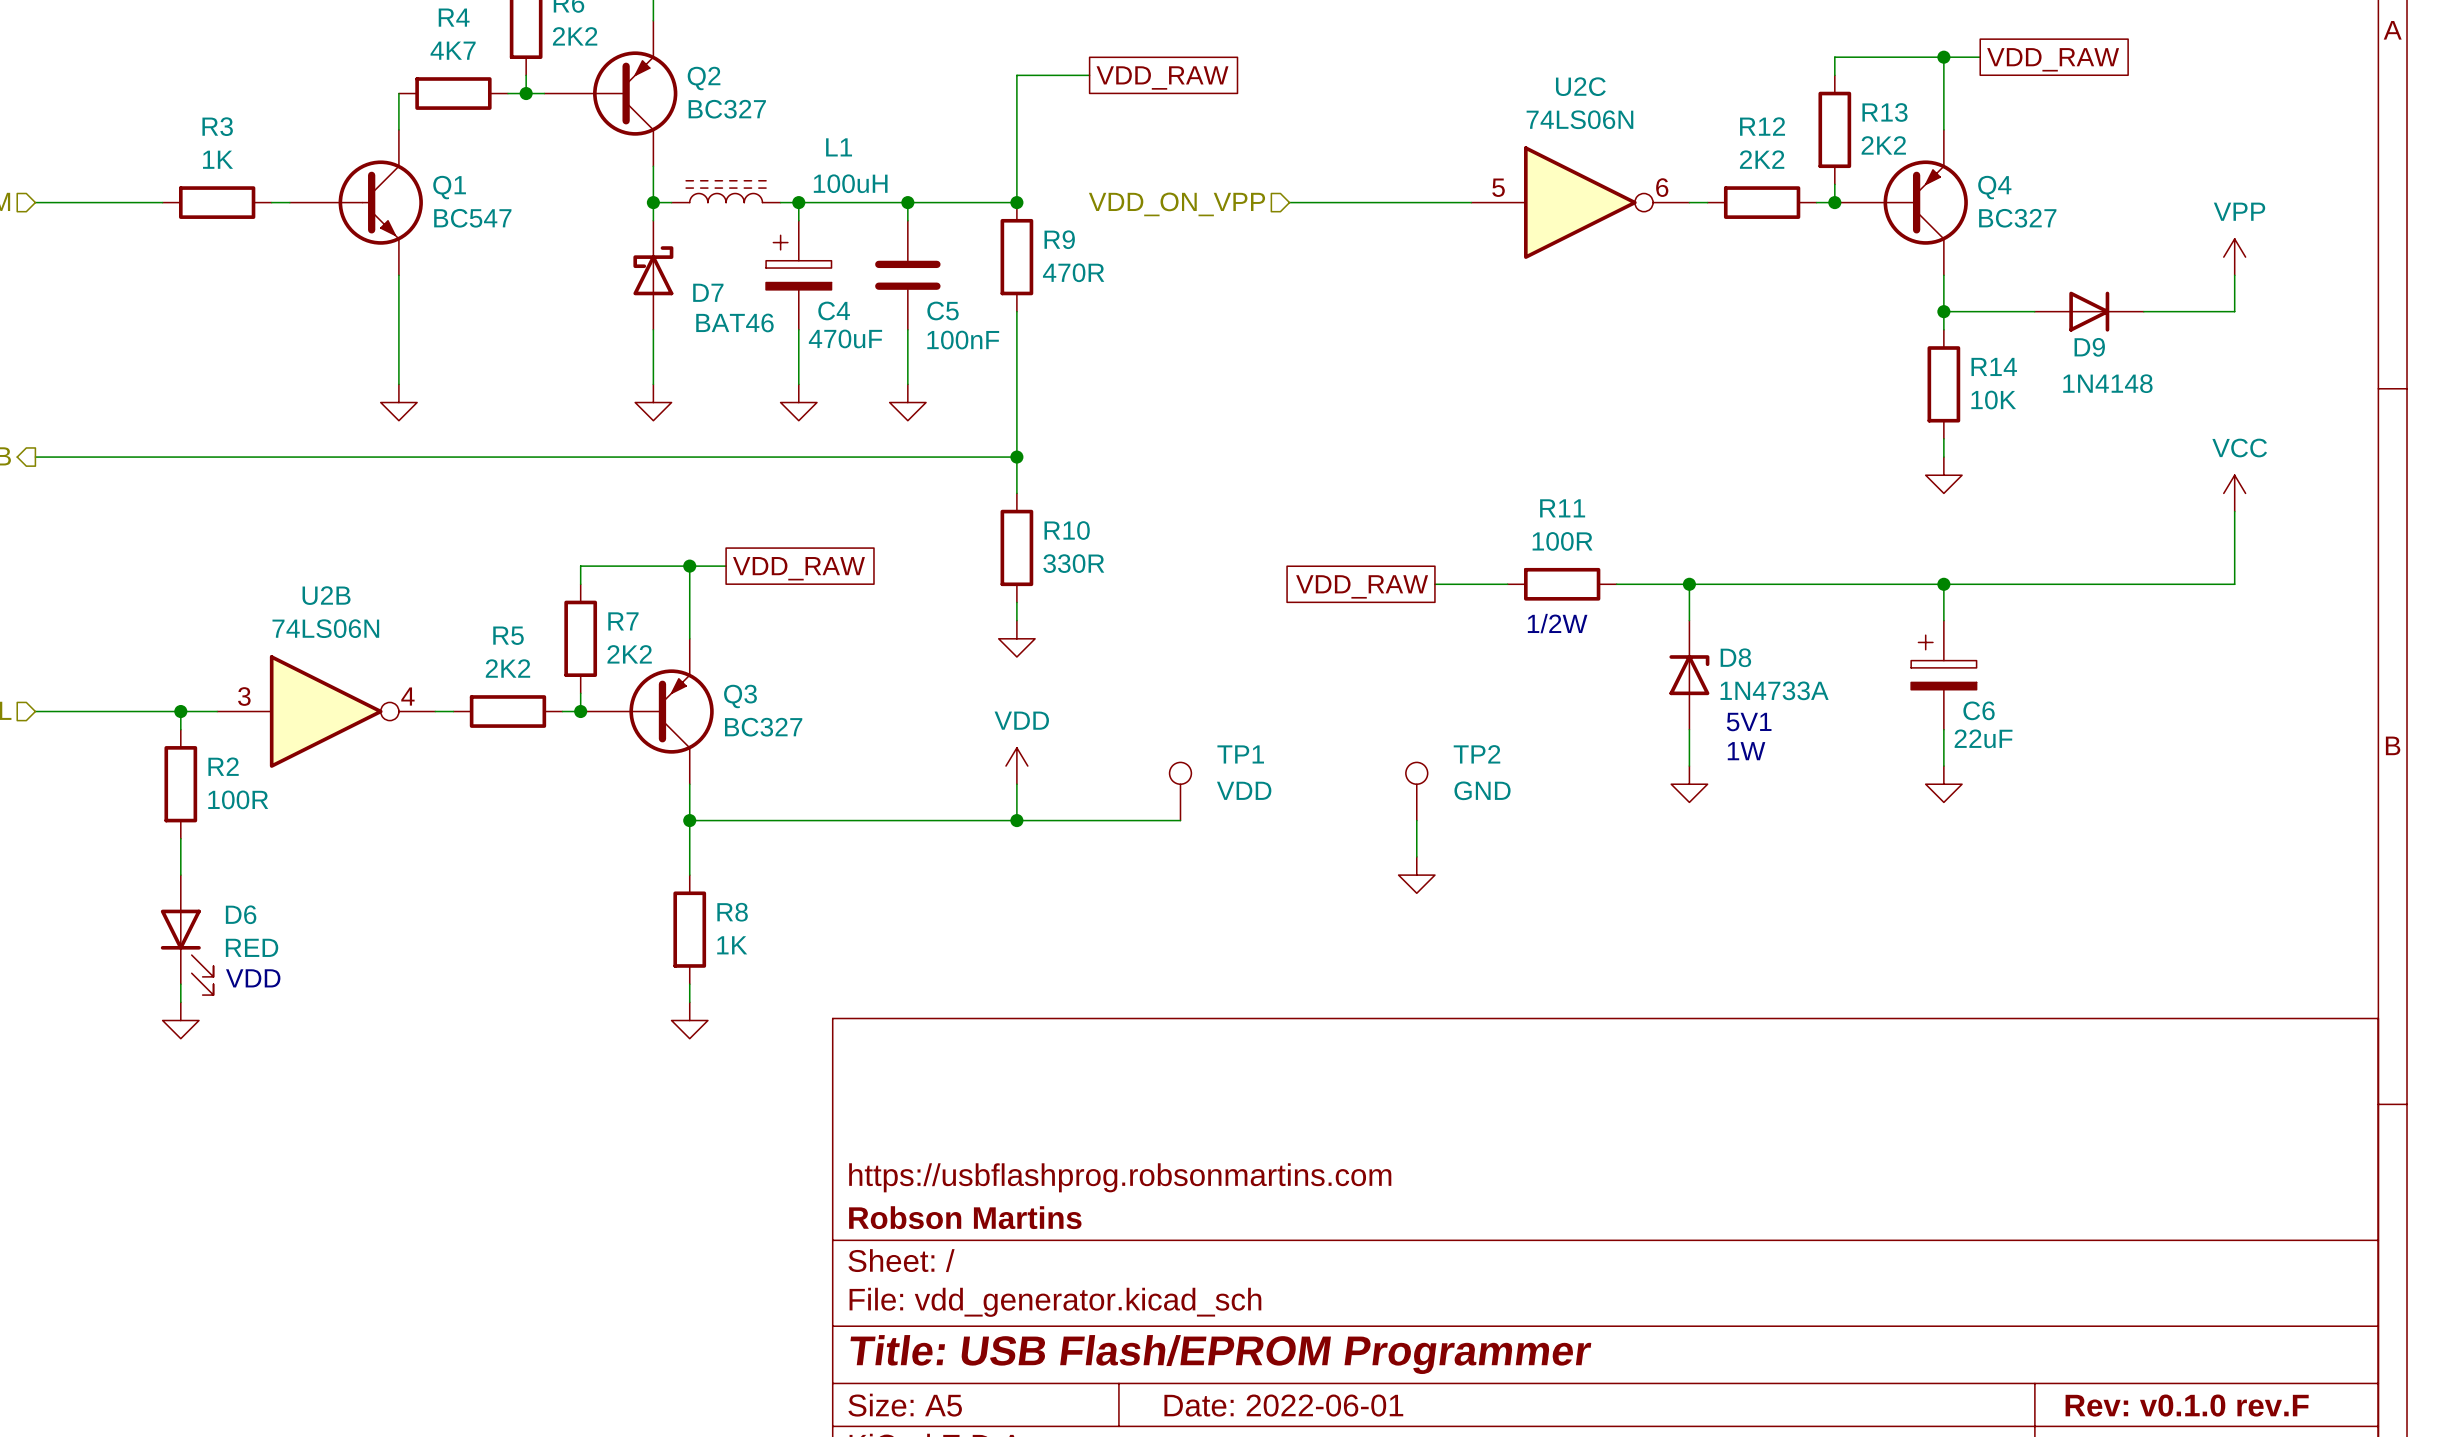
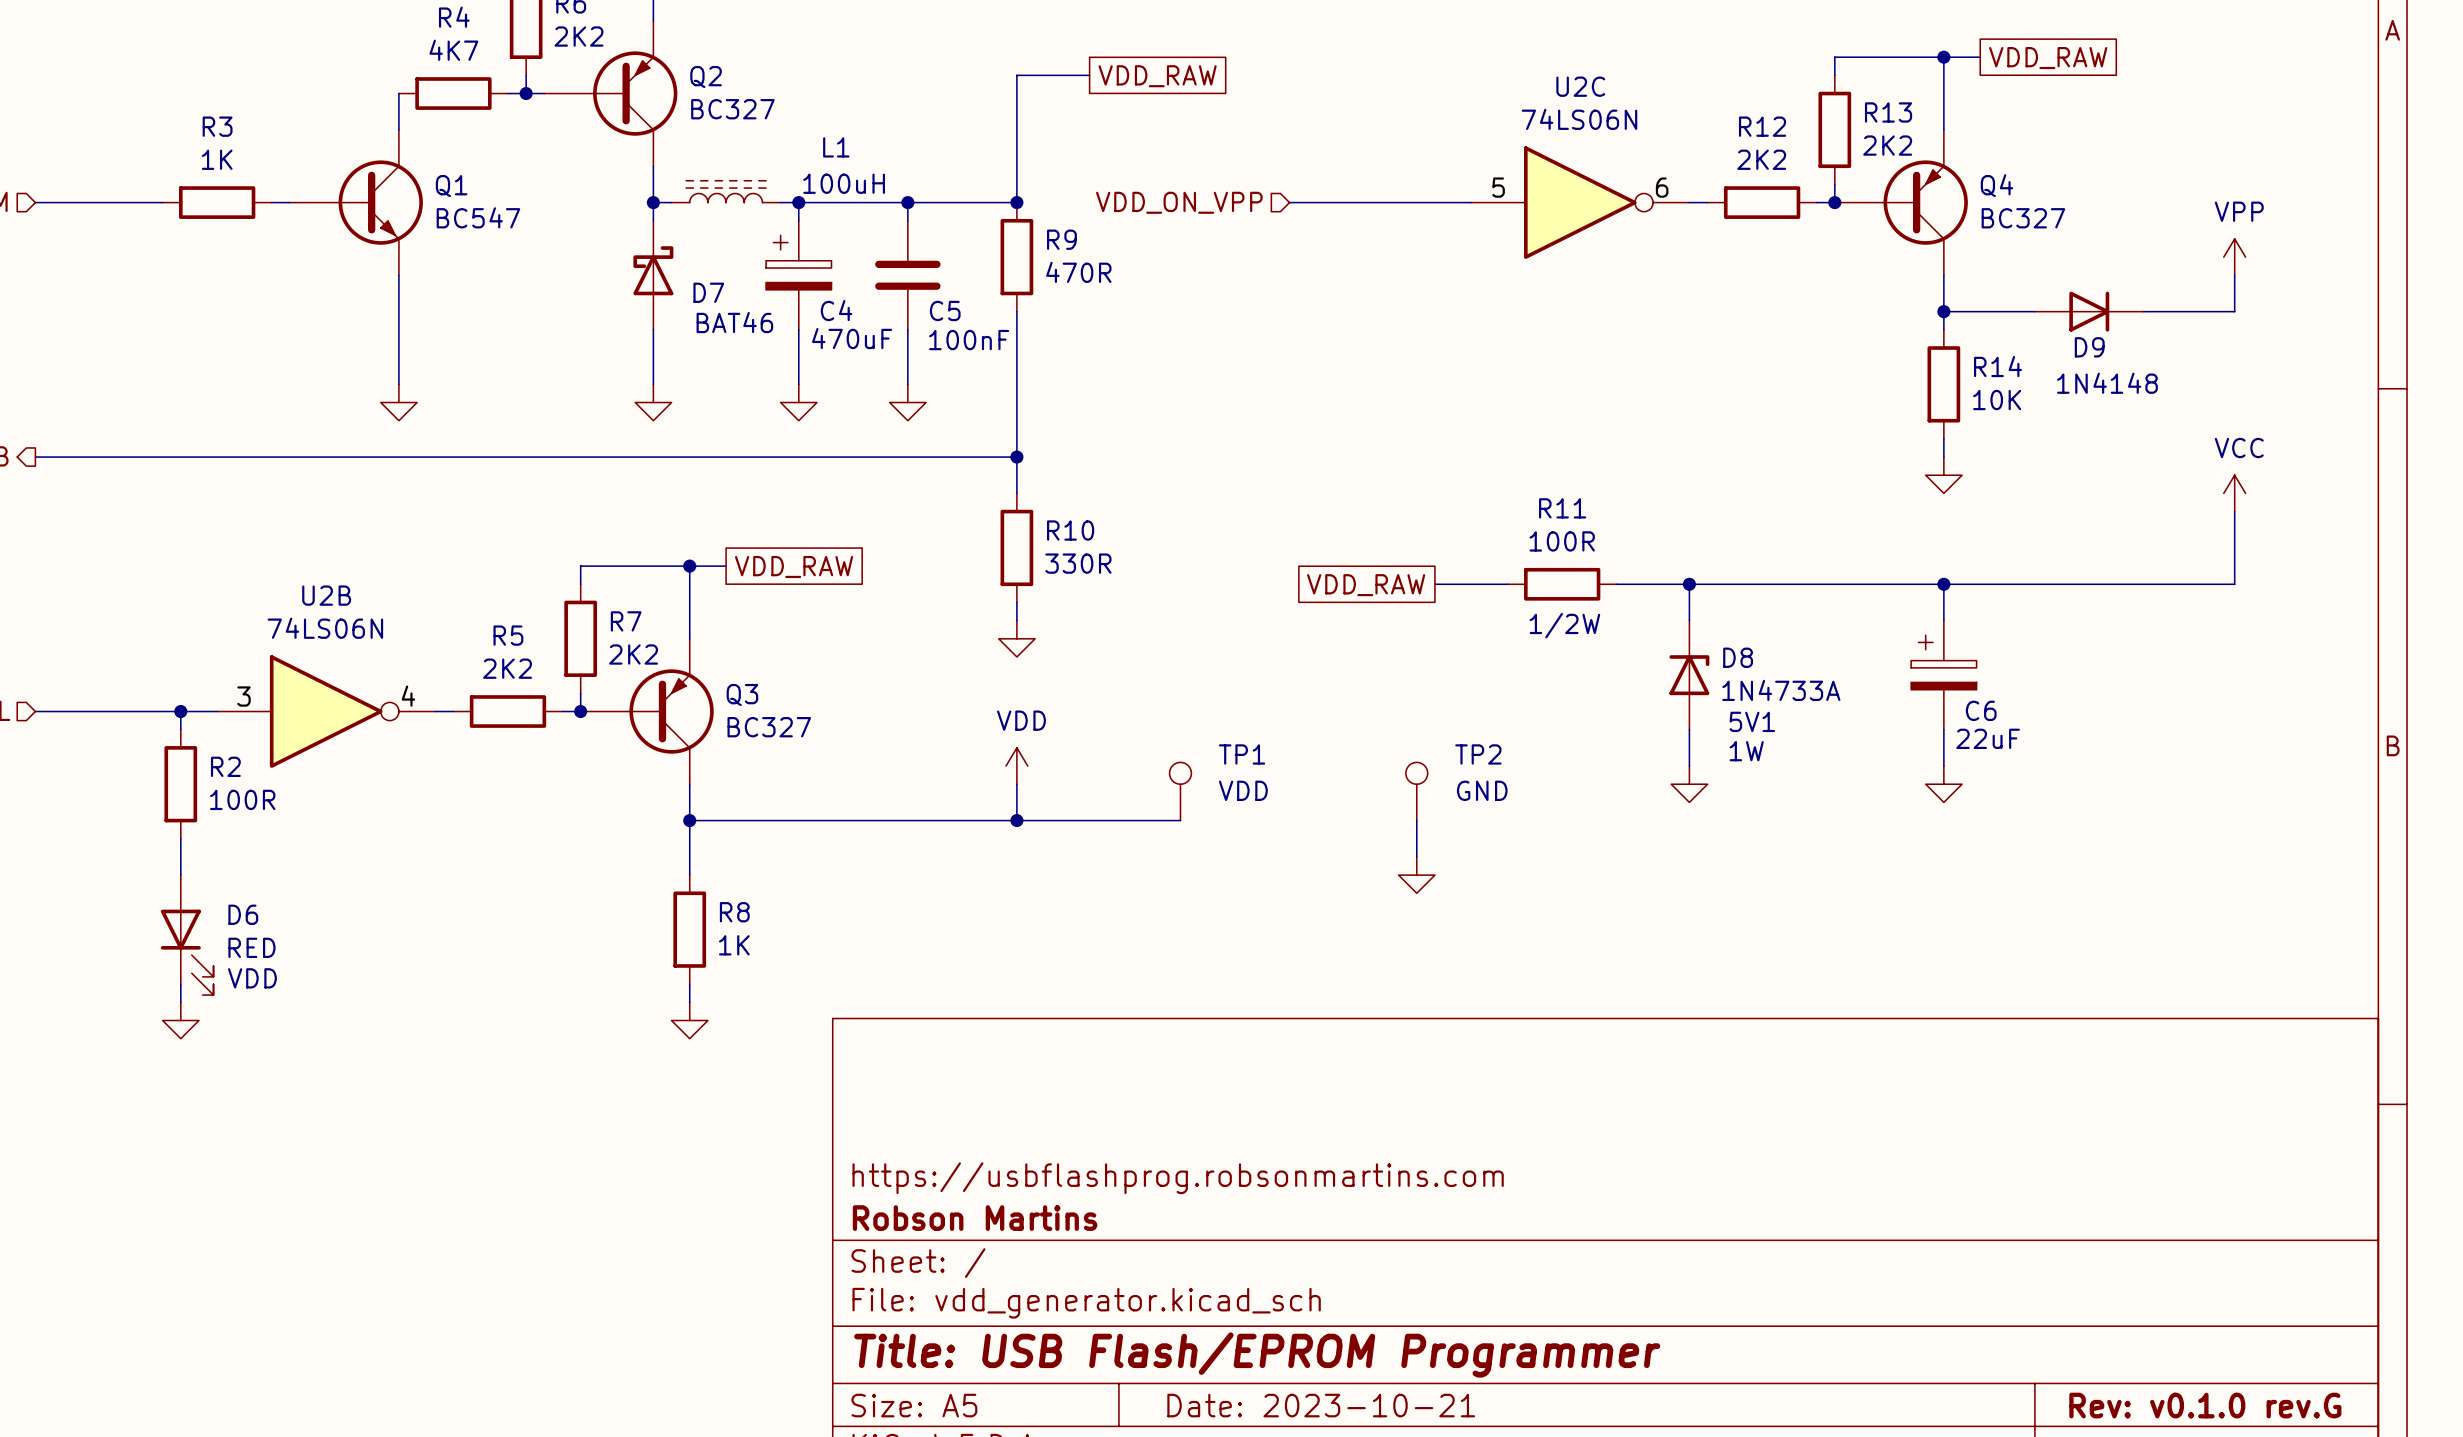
title block: Date: 2022-06-01 (1283, 1405) -> Date: 2023-10-21 (1321, 1405)
title block: Rev: v0.1.0 rev.F (2187, 1405) -> Rev: v0.1.0 rev.G (2205, 1405)

